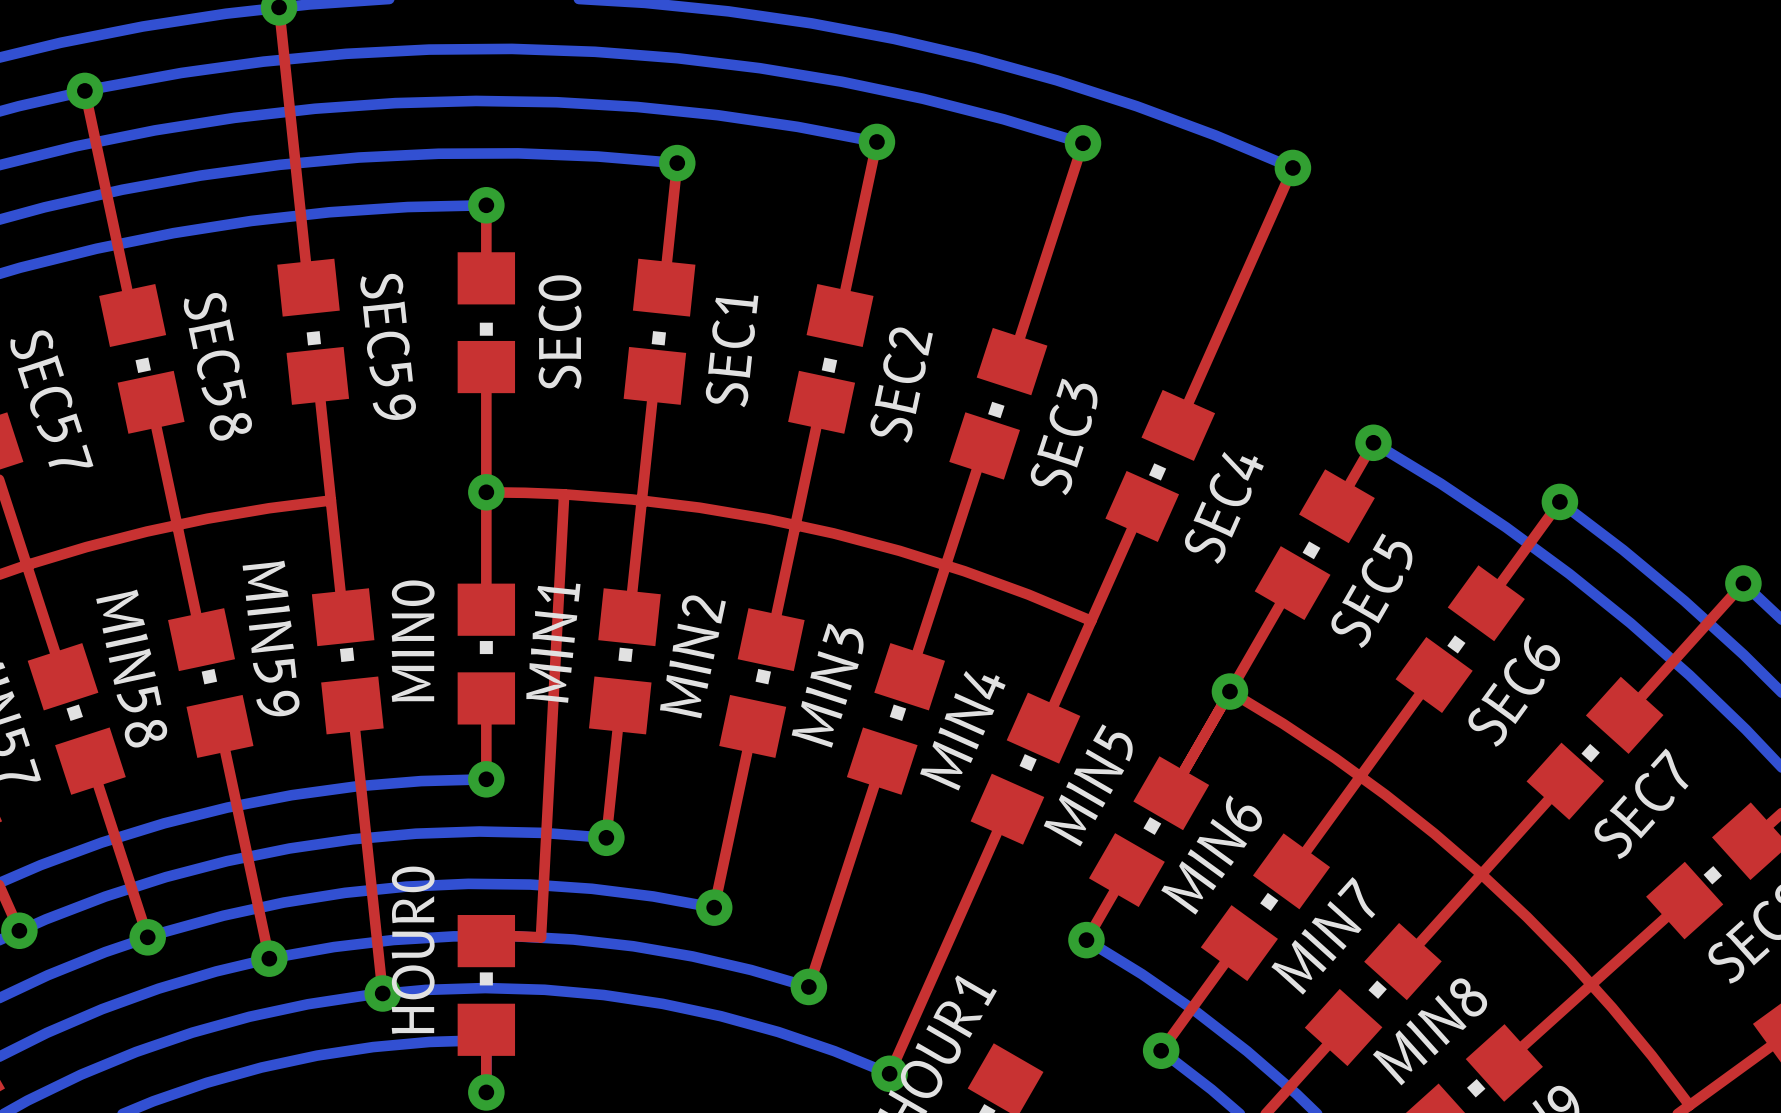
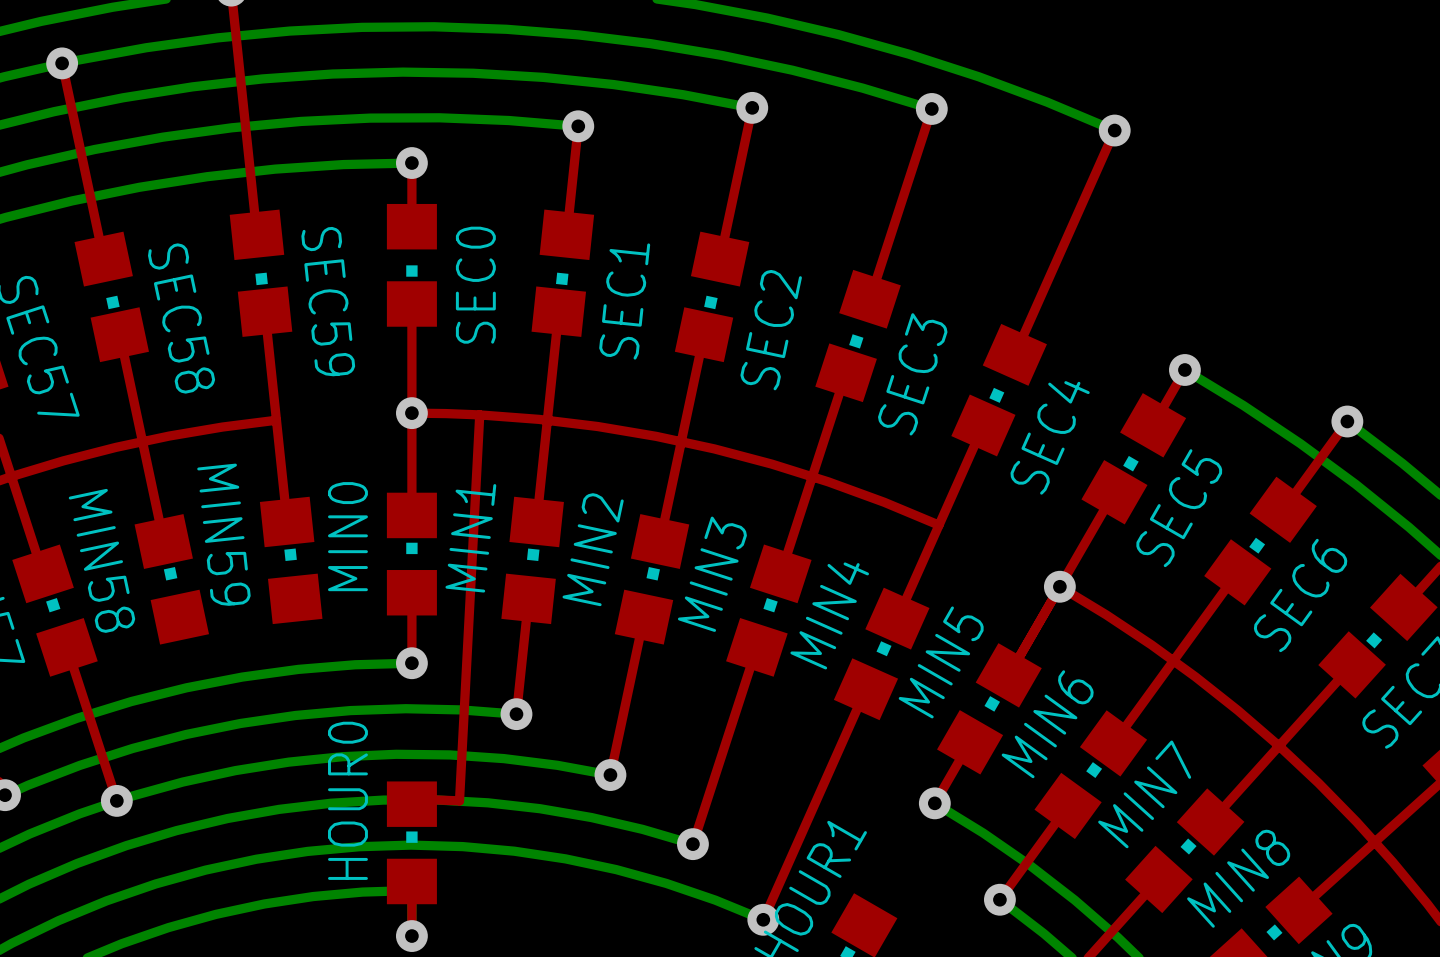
top track: (352, 705) (382, 993) -> none
top track: (219, 726) (269, 958) -> none
via: (269, 958) -> none
via: (382, 993) -> none

